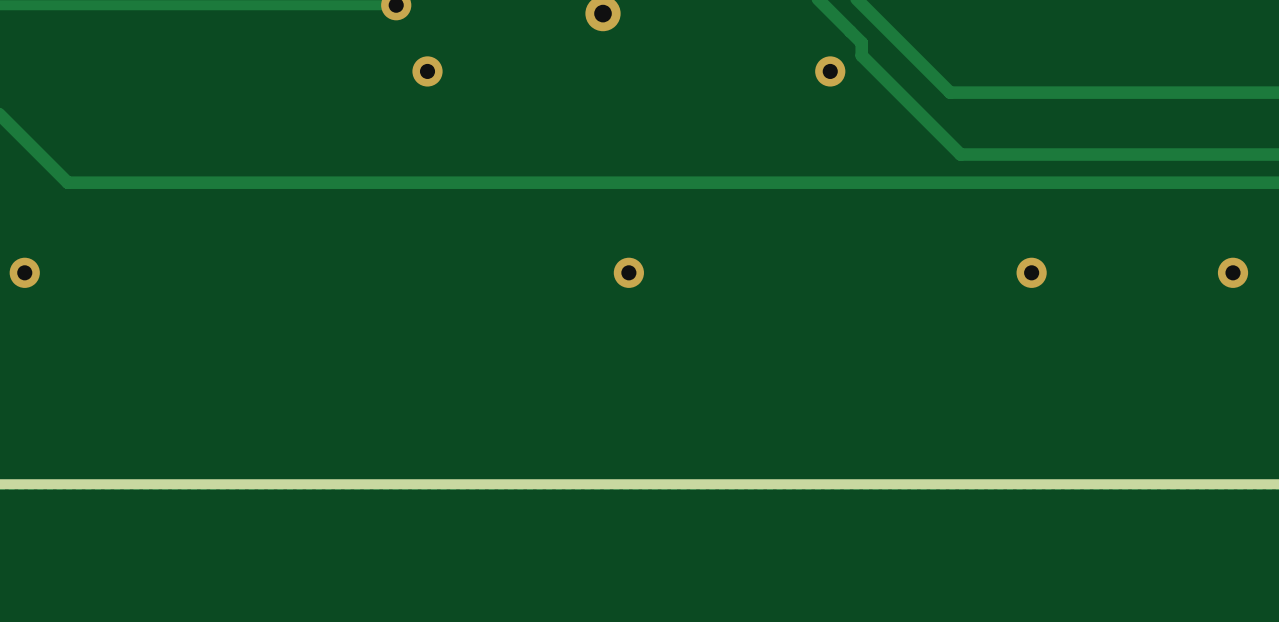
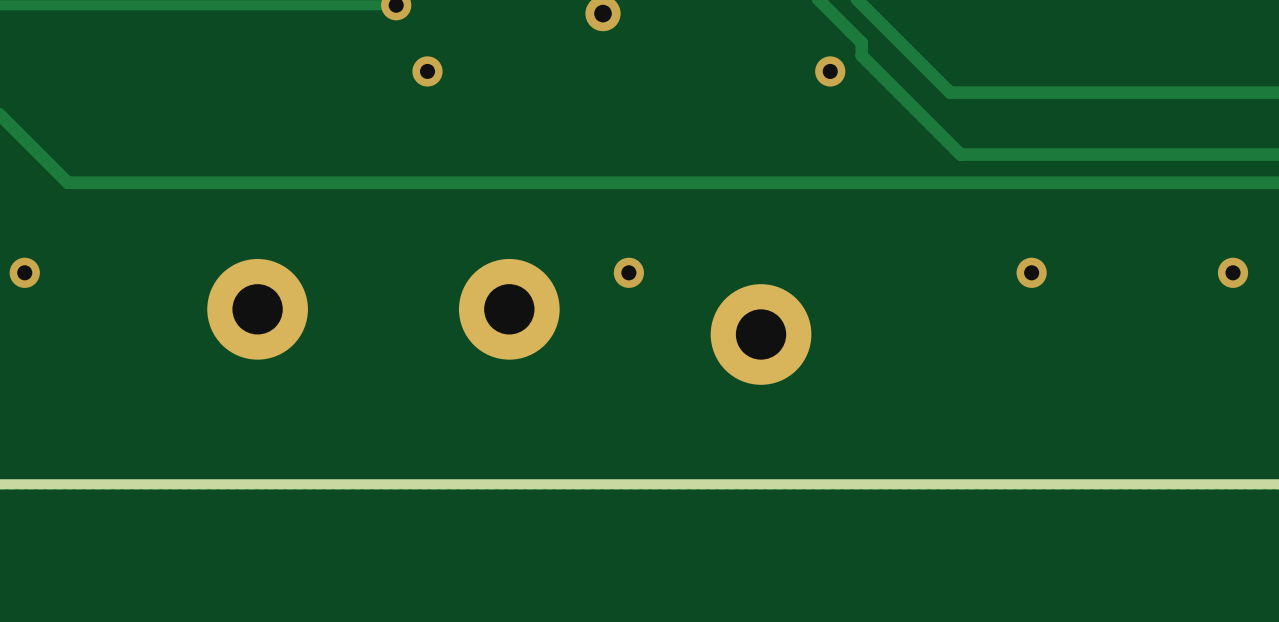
part: none -> (257, 309)
part: none -> (509, 309)
part: none -> (761, 334)

